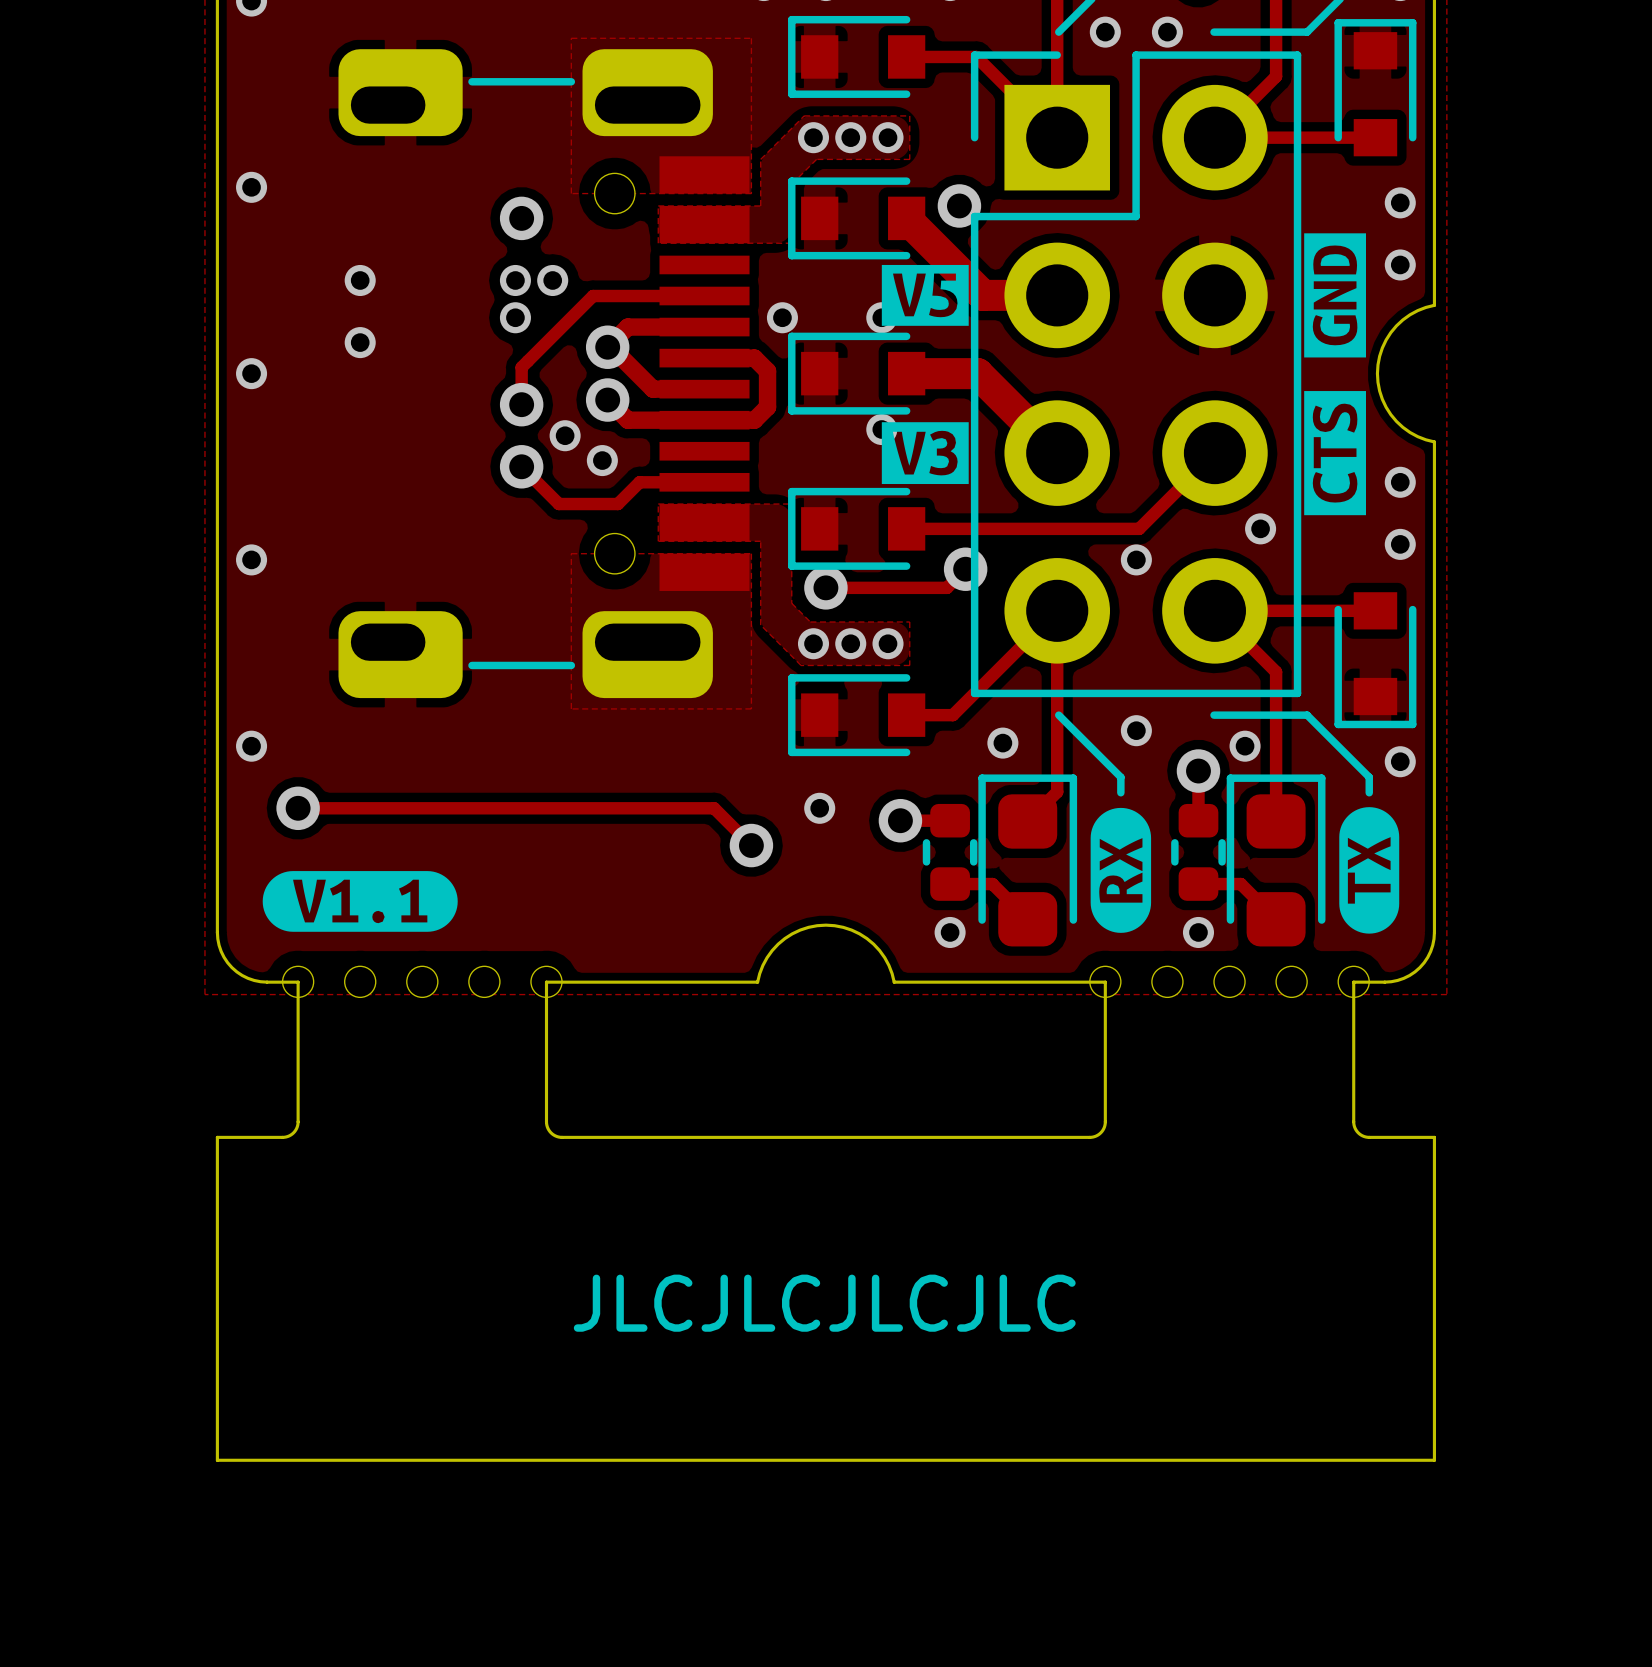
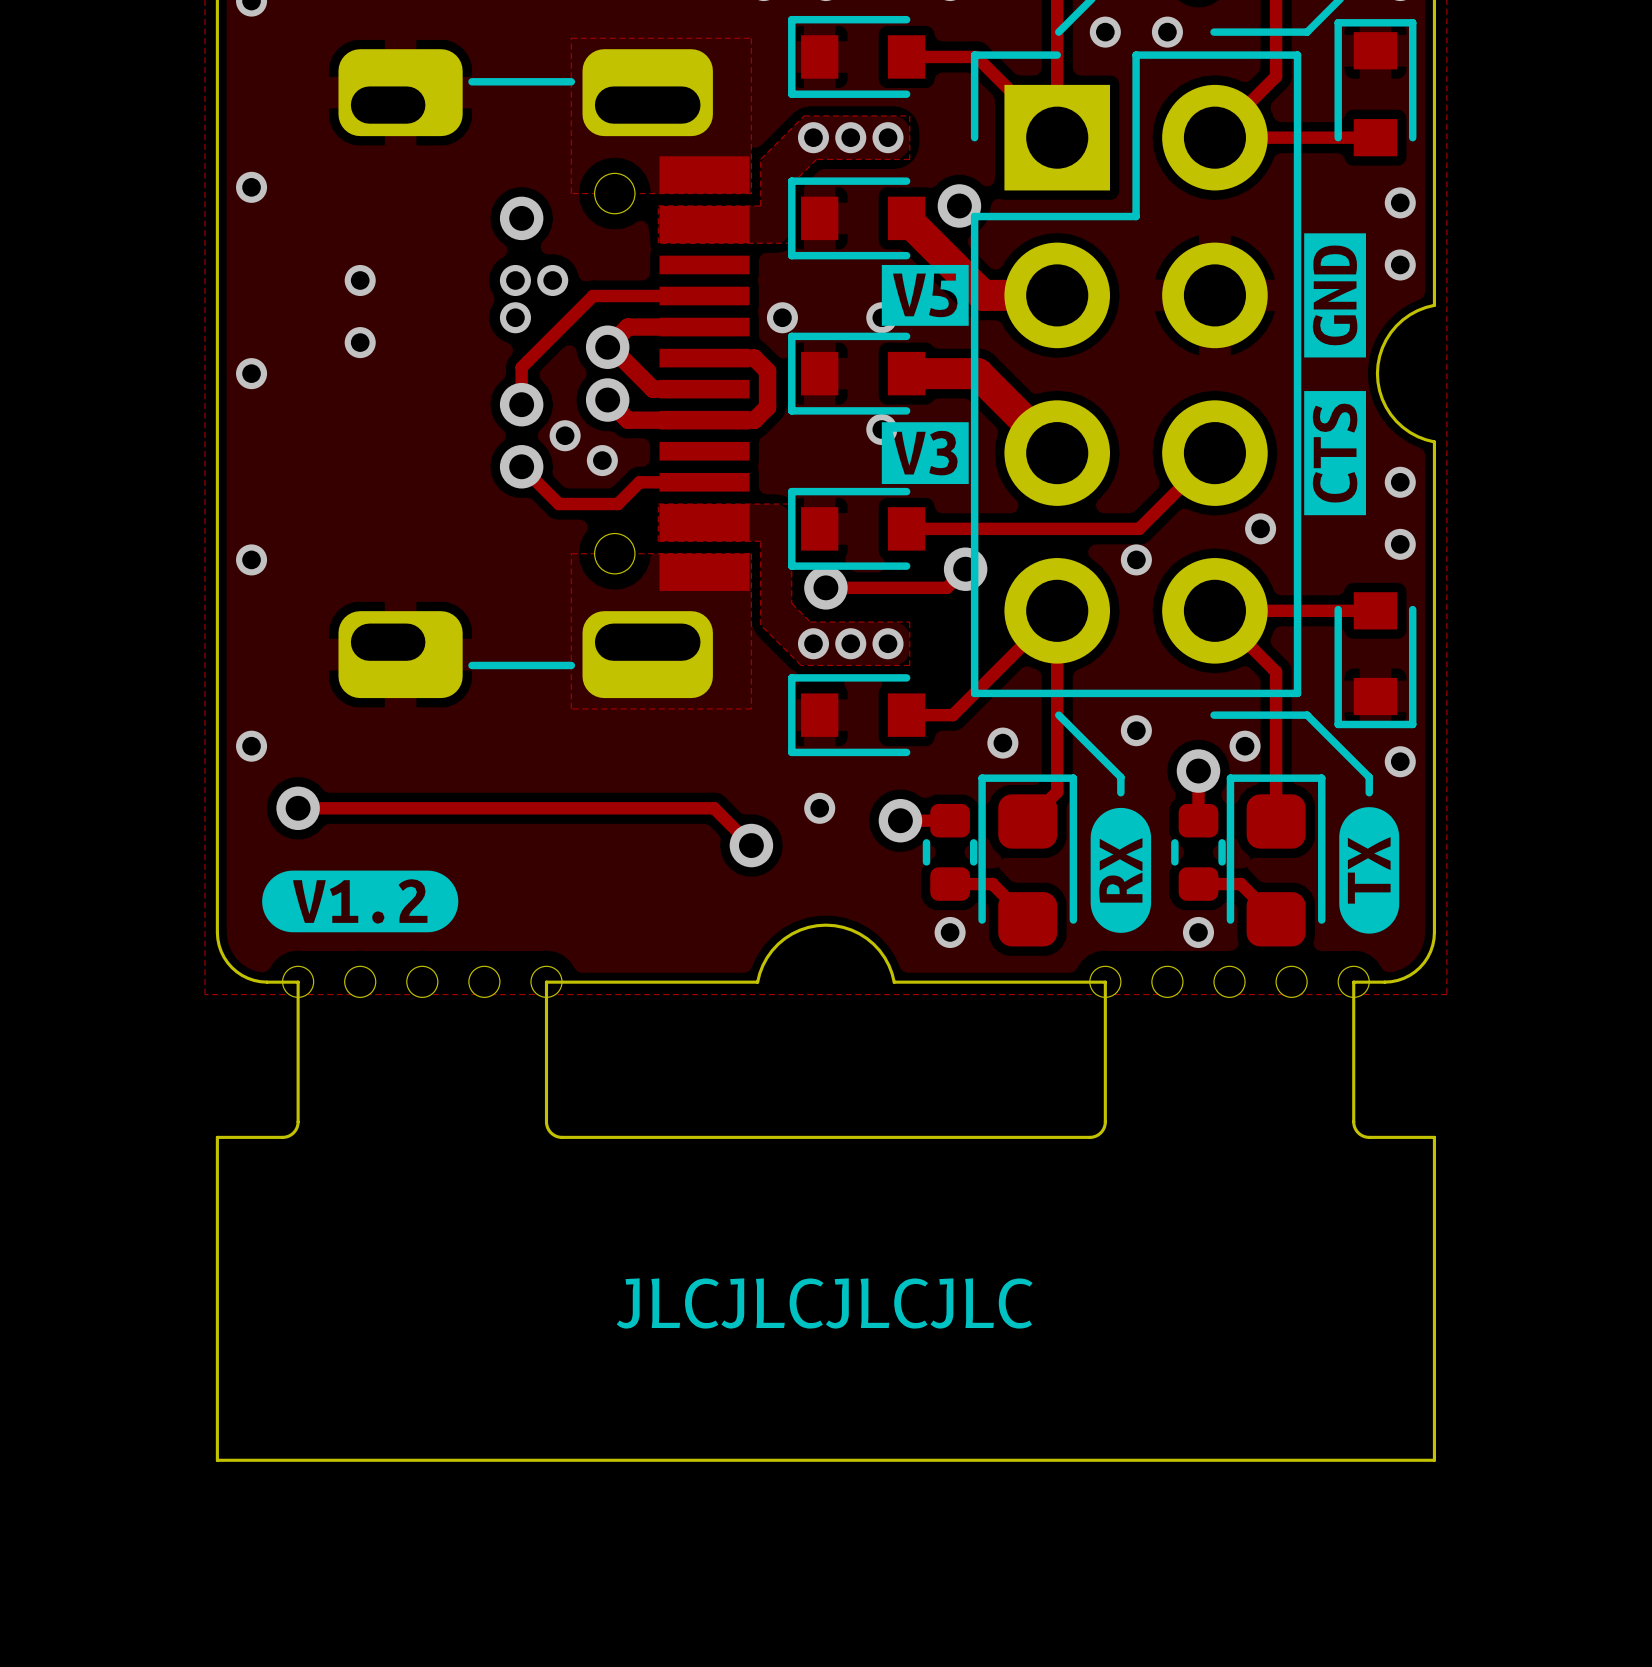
drawing shape: [262, 871, 458, 932] -> [262, 870, 459, 933]

